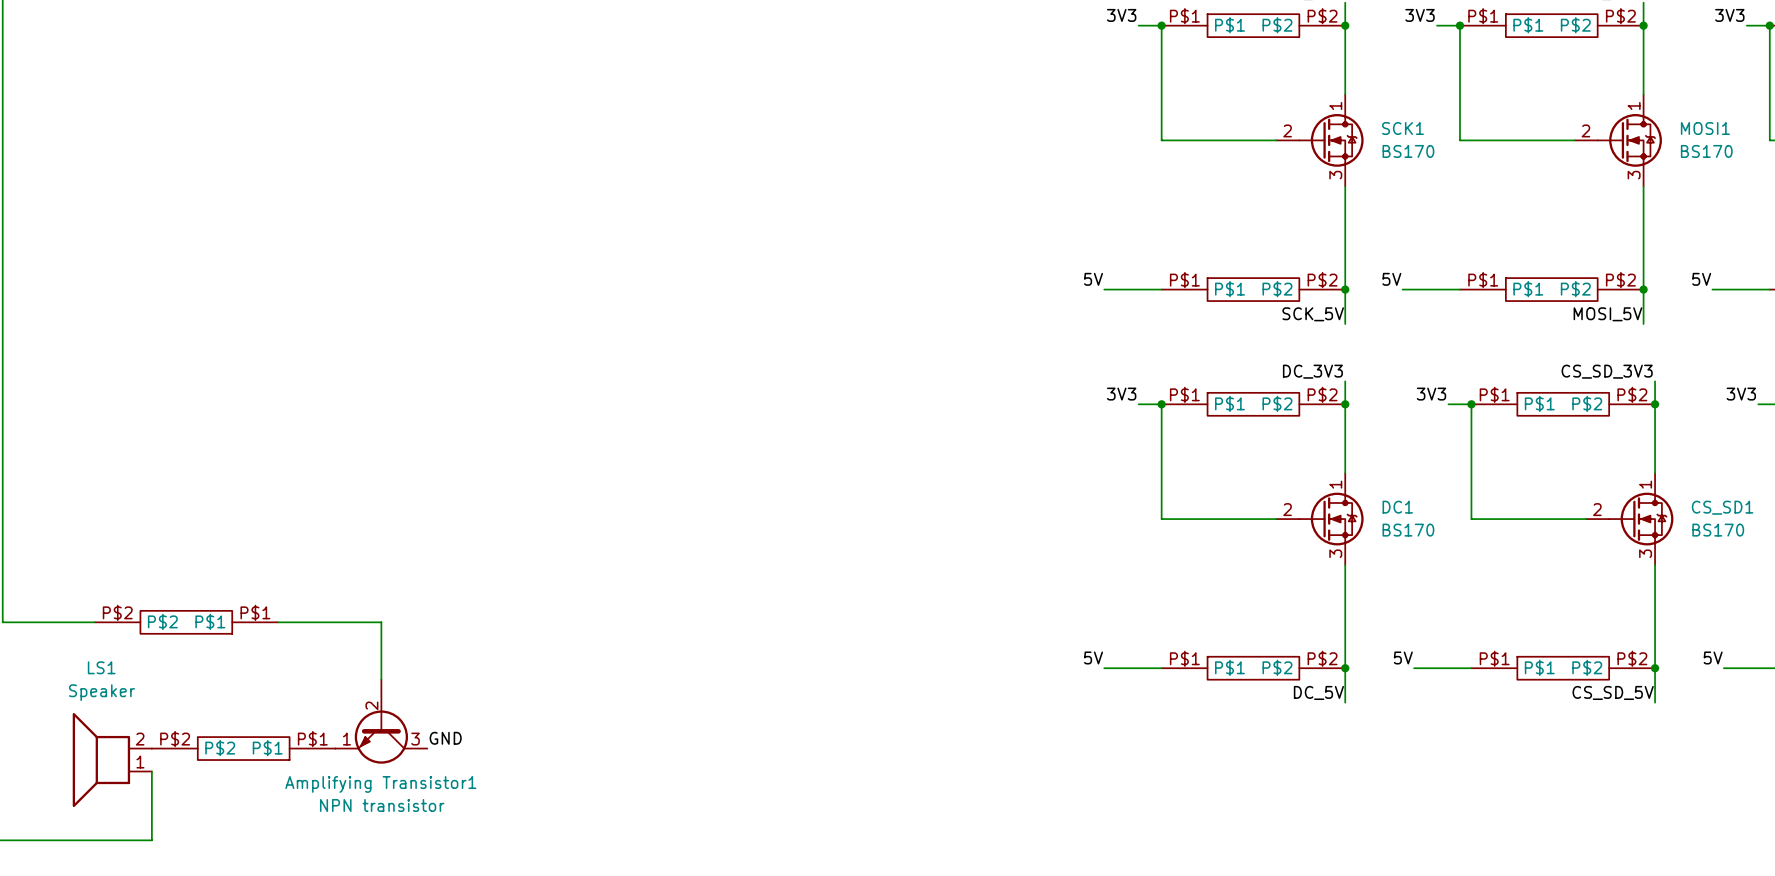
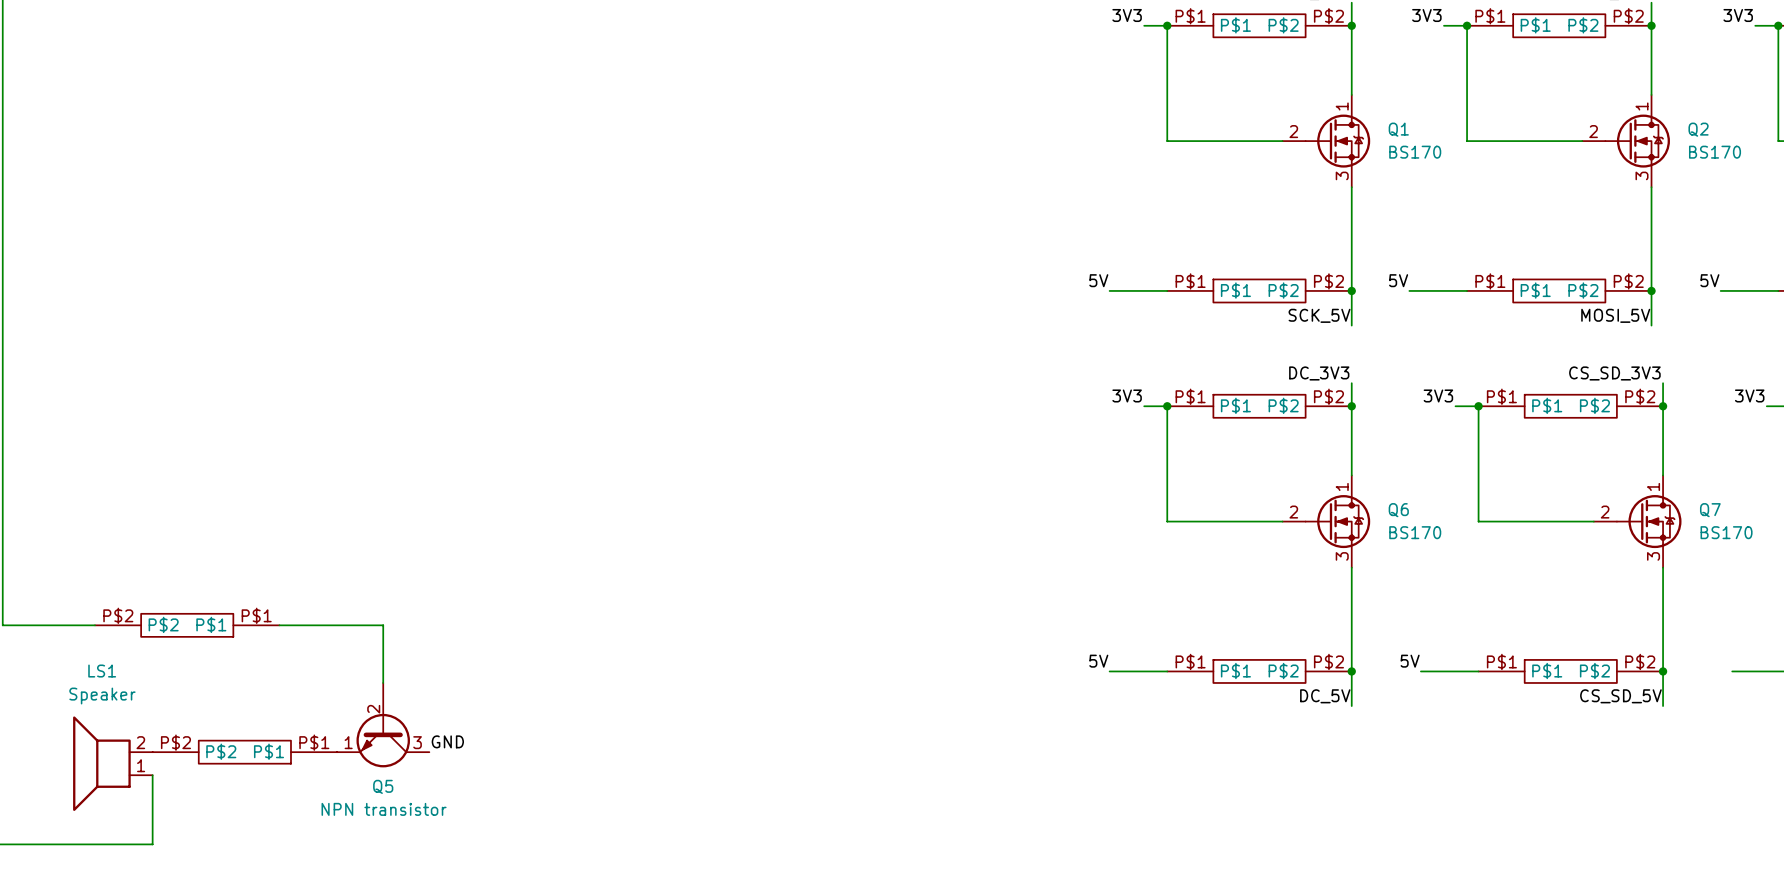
SCK1 name: SCK1 (1402, 128) -> Q1 (1398, 129)
MOSI1 name: MOSI1 (1705, 128) -> Q2 (1698, 129)
DC1 name: DC1 (1397, 507) -> Q6 (1398, 510)
CS_SD1 name: CS_SD1 (1722, 507) -> Q7 (1710, 510)
label: 5V (1713, 657) -> none
Amplifying Transistor1 name: Amplifying Transistor1 (380, 784) -> Q5 (383, 786)

